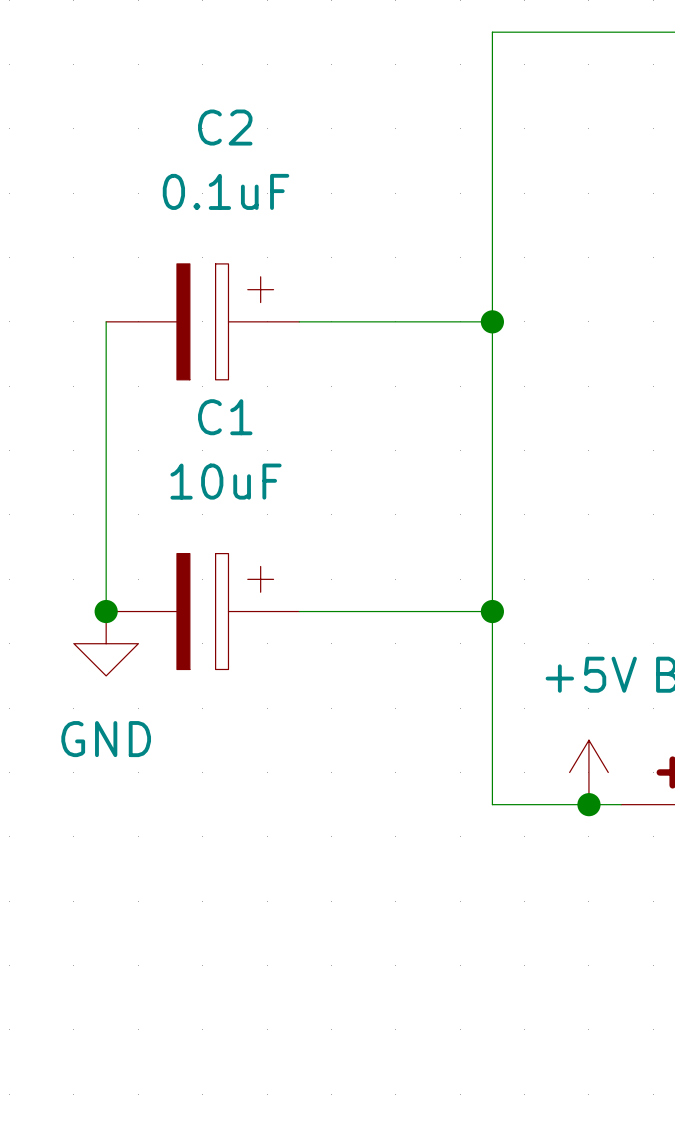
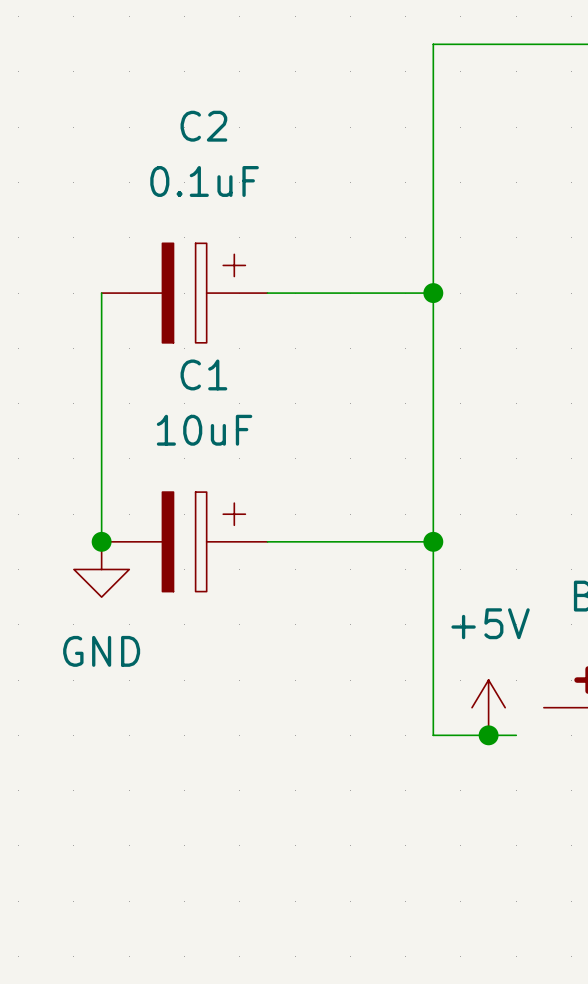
power symbol position: +5V (588, 772) -> +5V (488, 707)
wire: (492, 804) (621, 804) -> (433, 707) (433, 735) (516, 735)
junction position: (588, 804) -> (488, 735)

